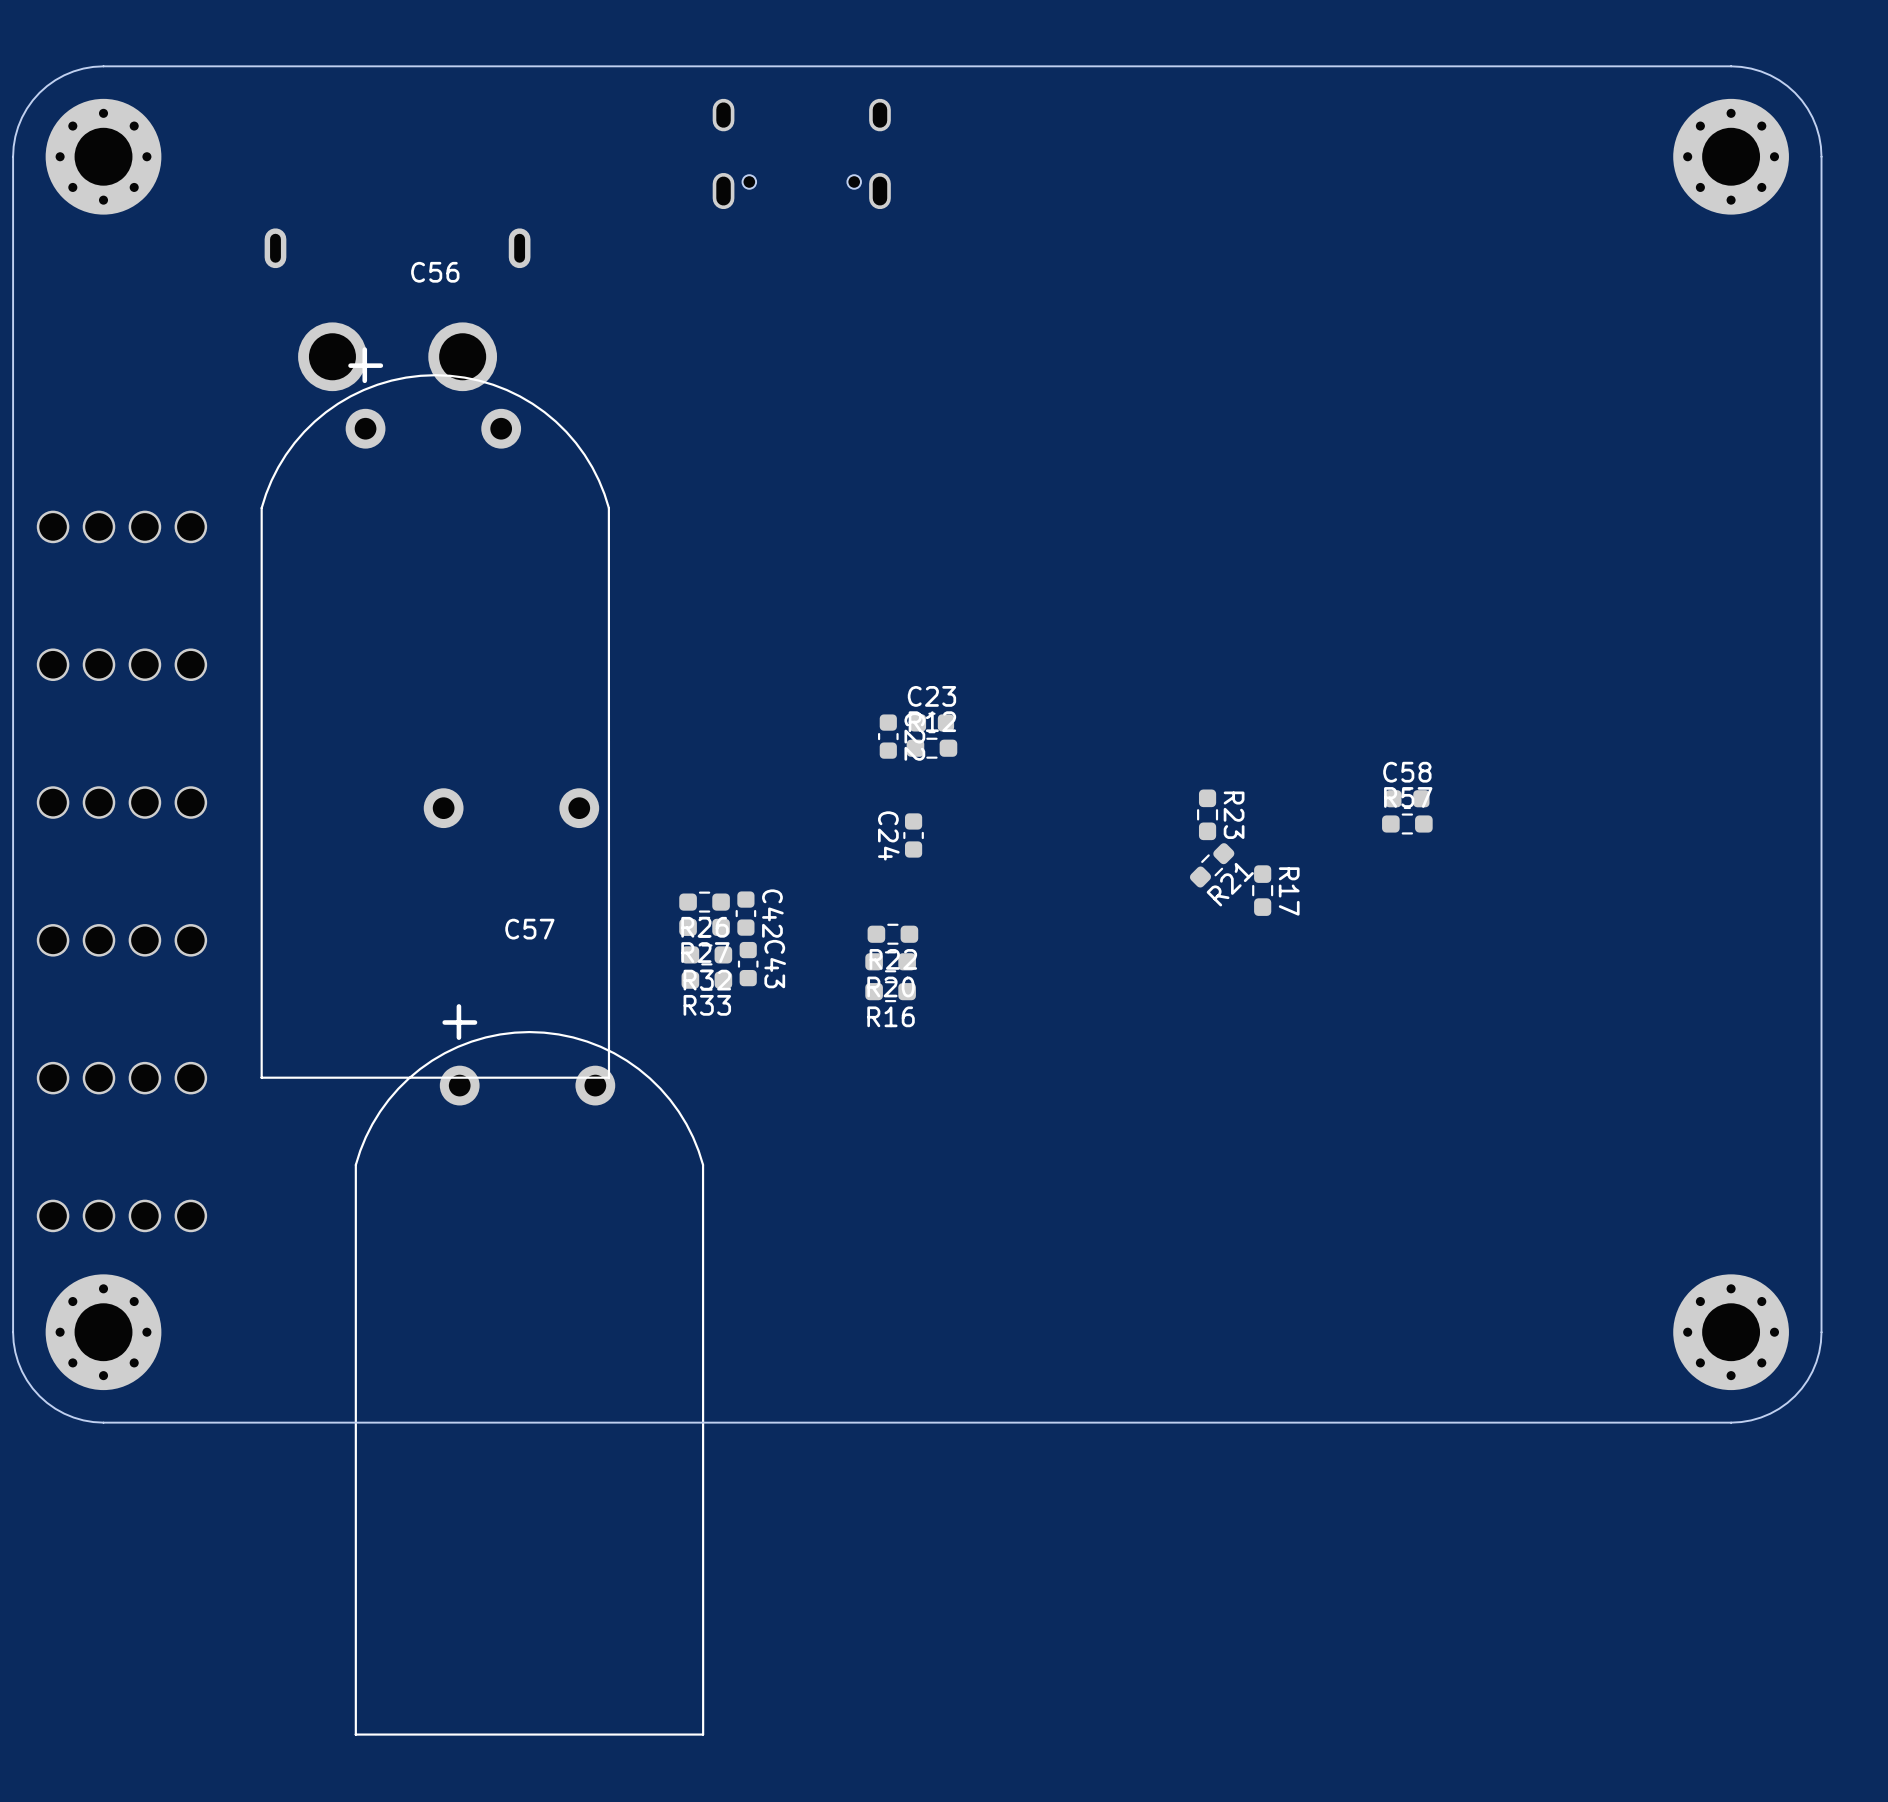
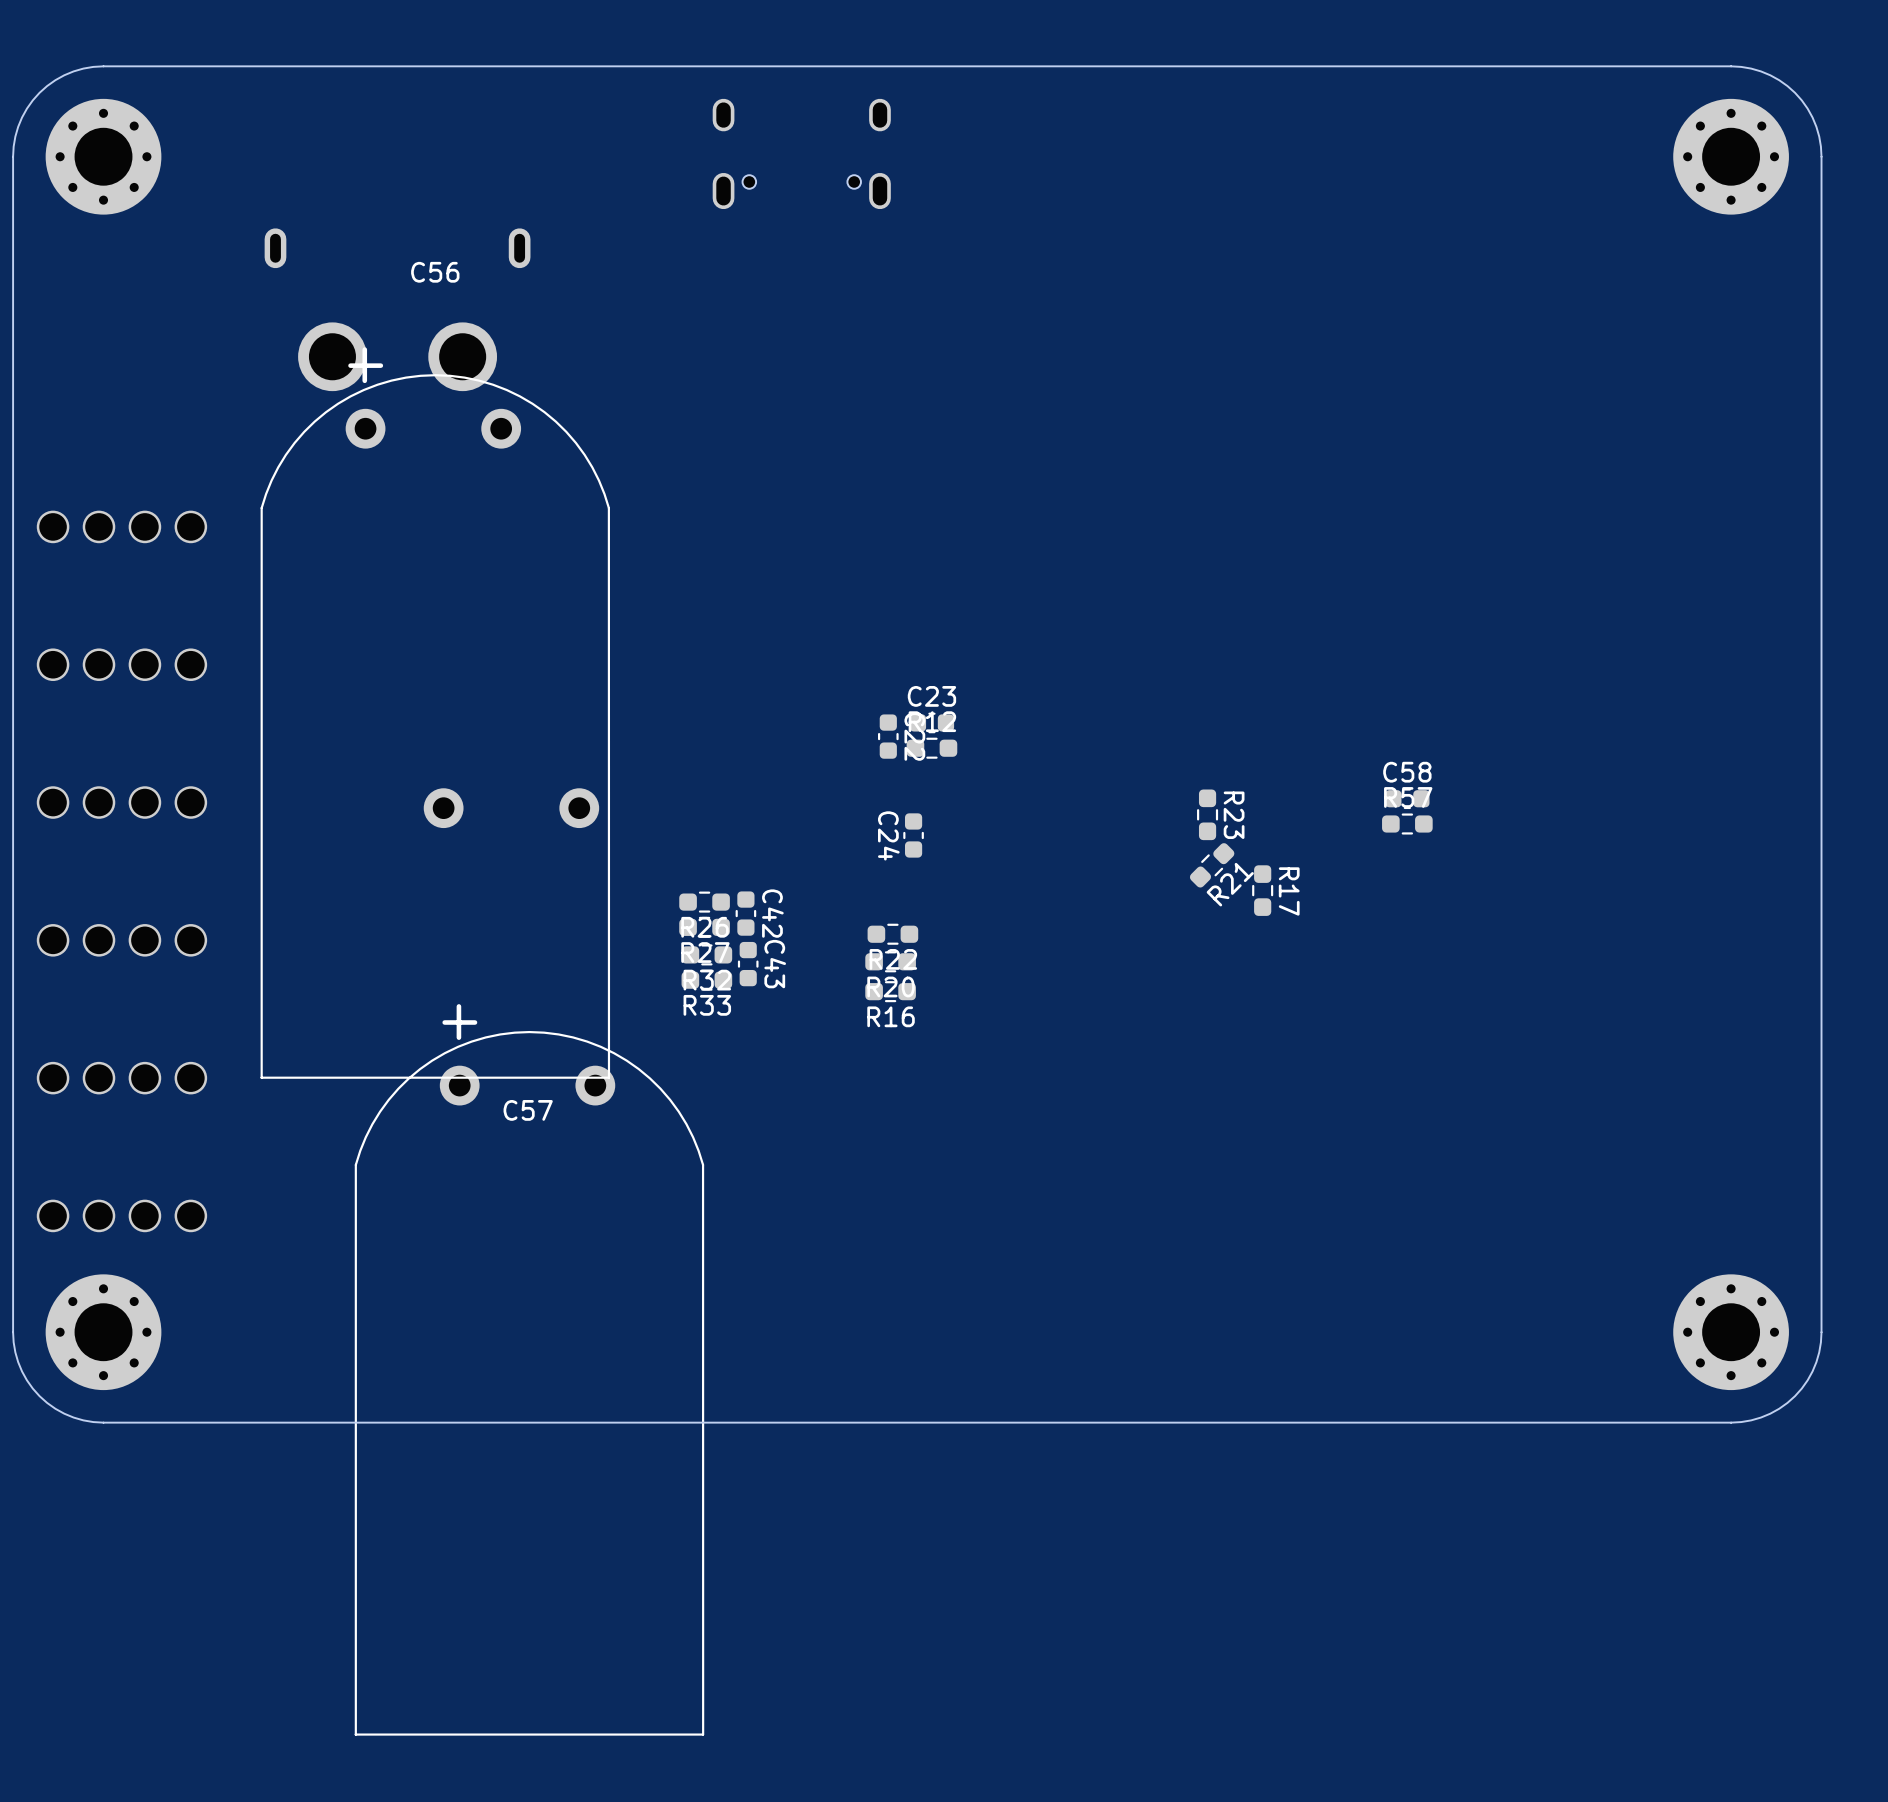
C57 name position: C57 (529, 929) -> C57 (528, 1110)

